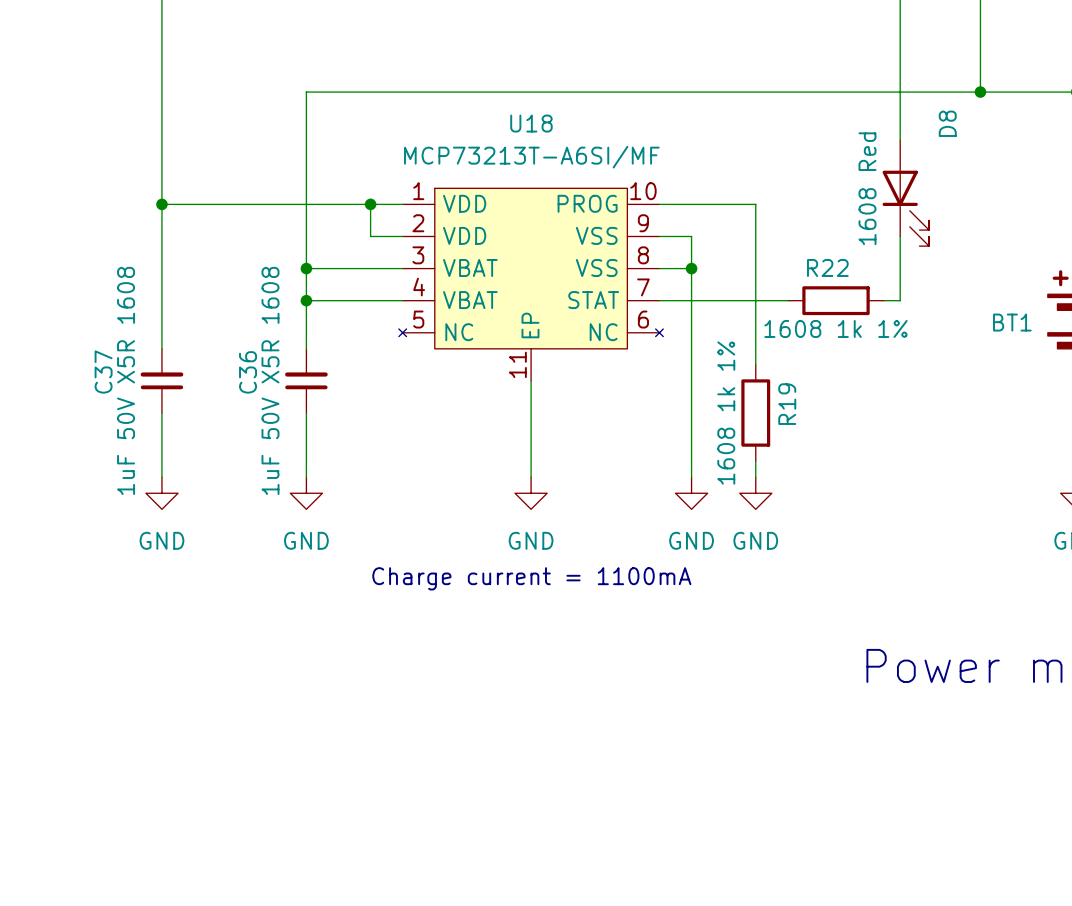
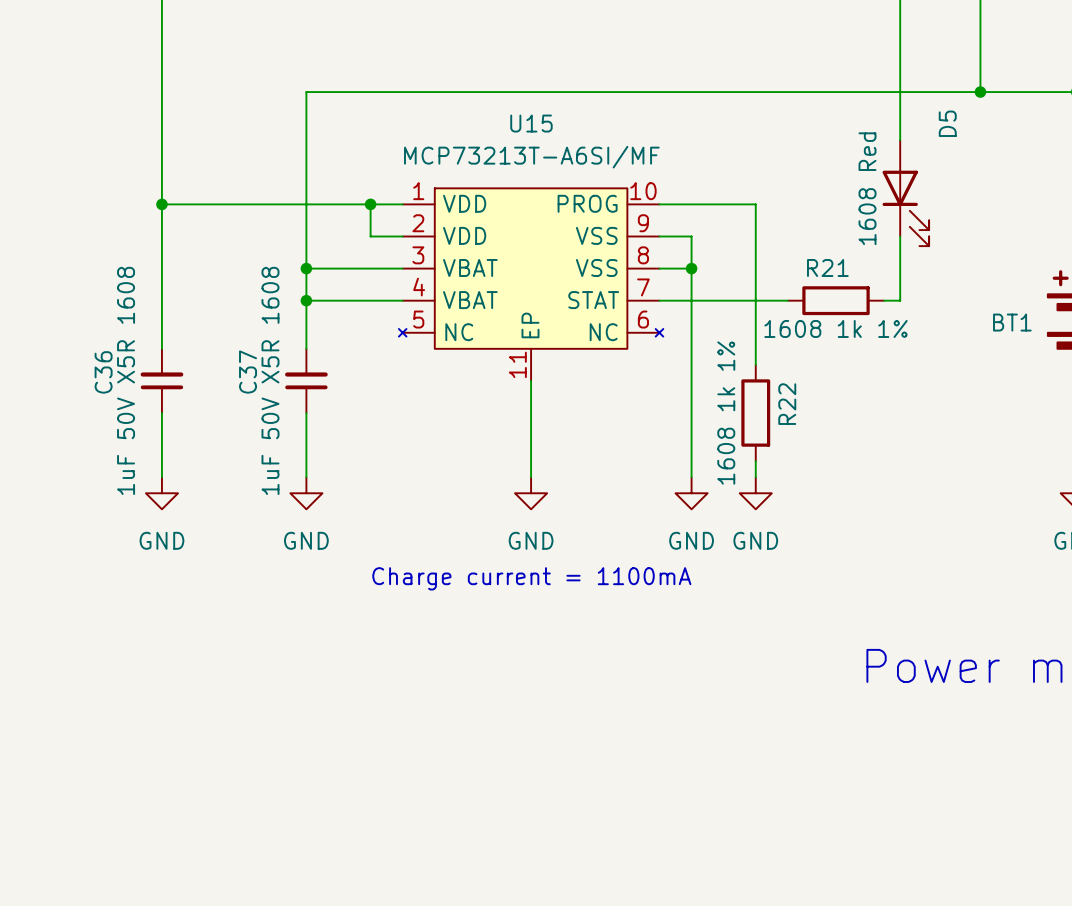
U18 name: U18 (531, 123) -> U15 (531, 123)
D8 name: D8 (947, 123) -> D5 (947, 123)
R22 name: R22 (827, 267) -> R21 (827, 267)
C37 name: C37 (103, 372) -> C36 (103, 372)
C36 name: C36 (248, 372) -> C37 (248, 372)
R19 name: R19 (787, 404) -> R22 (787, 404)

